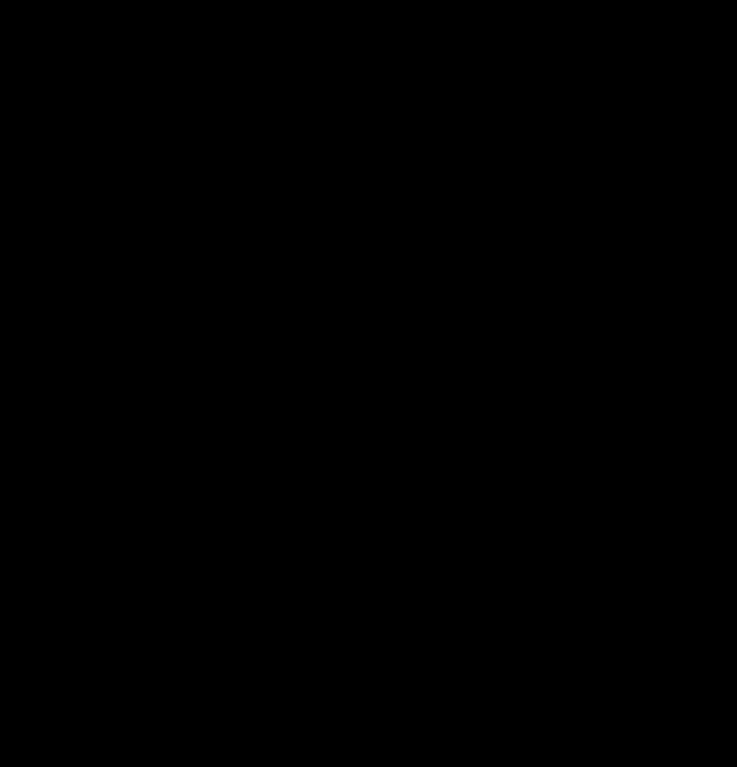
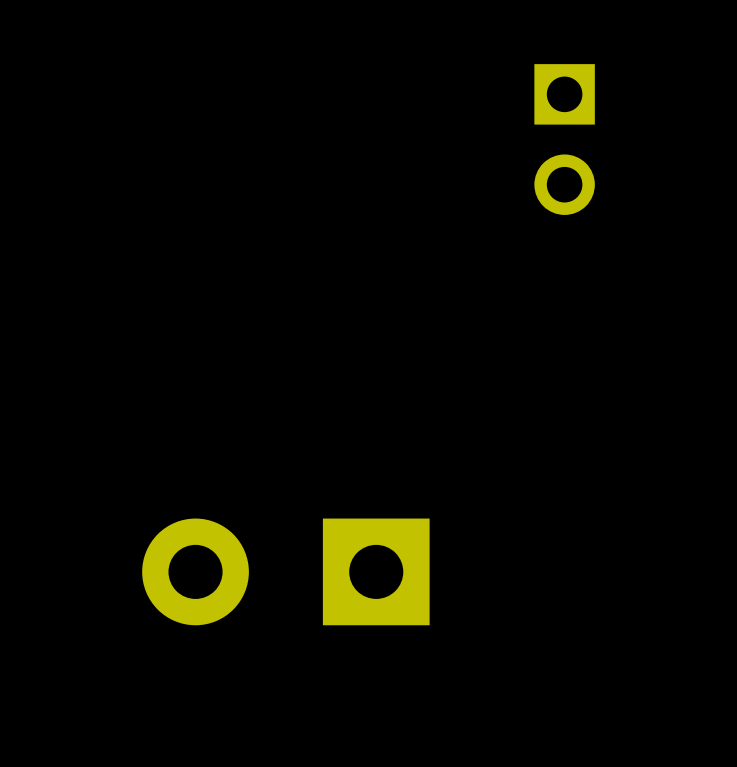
part: none -> (564, 139)
part: none -> (285, 571)

